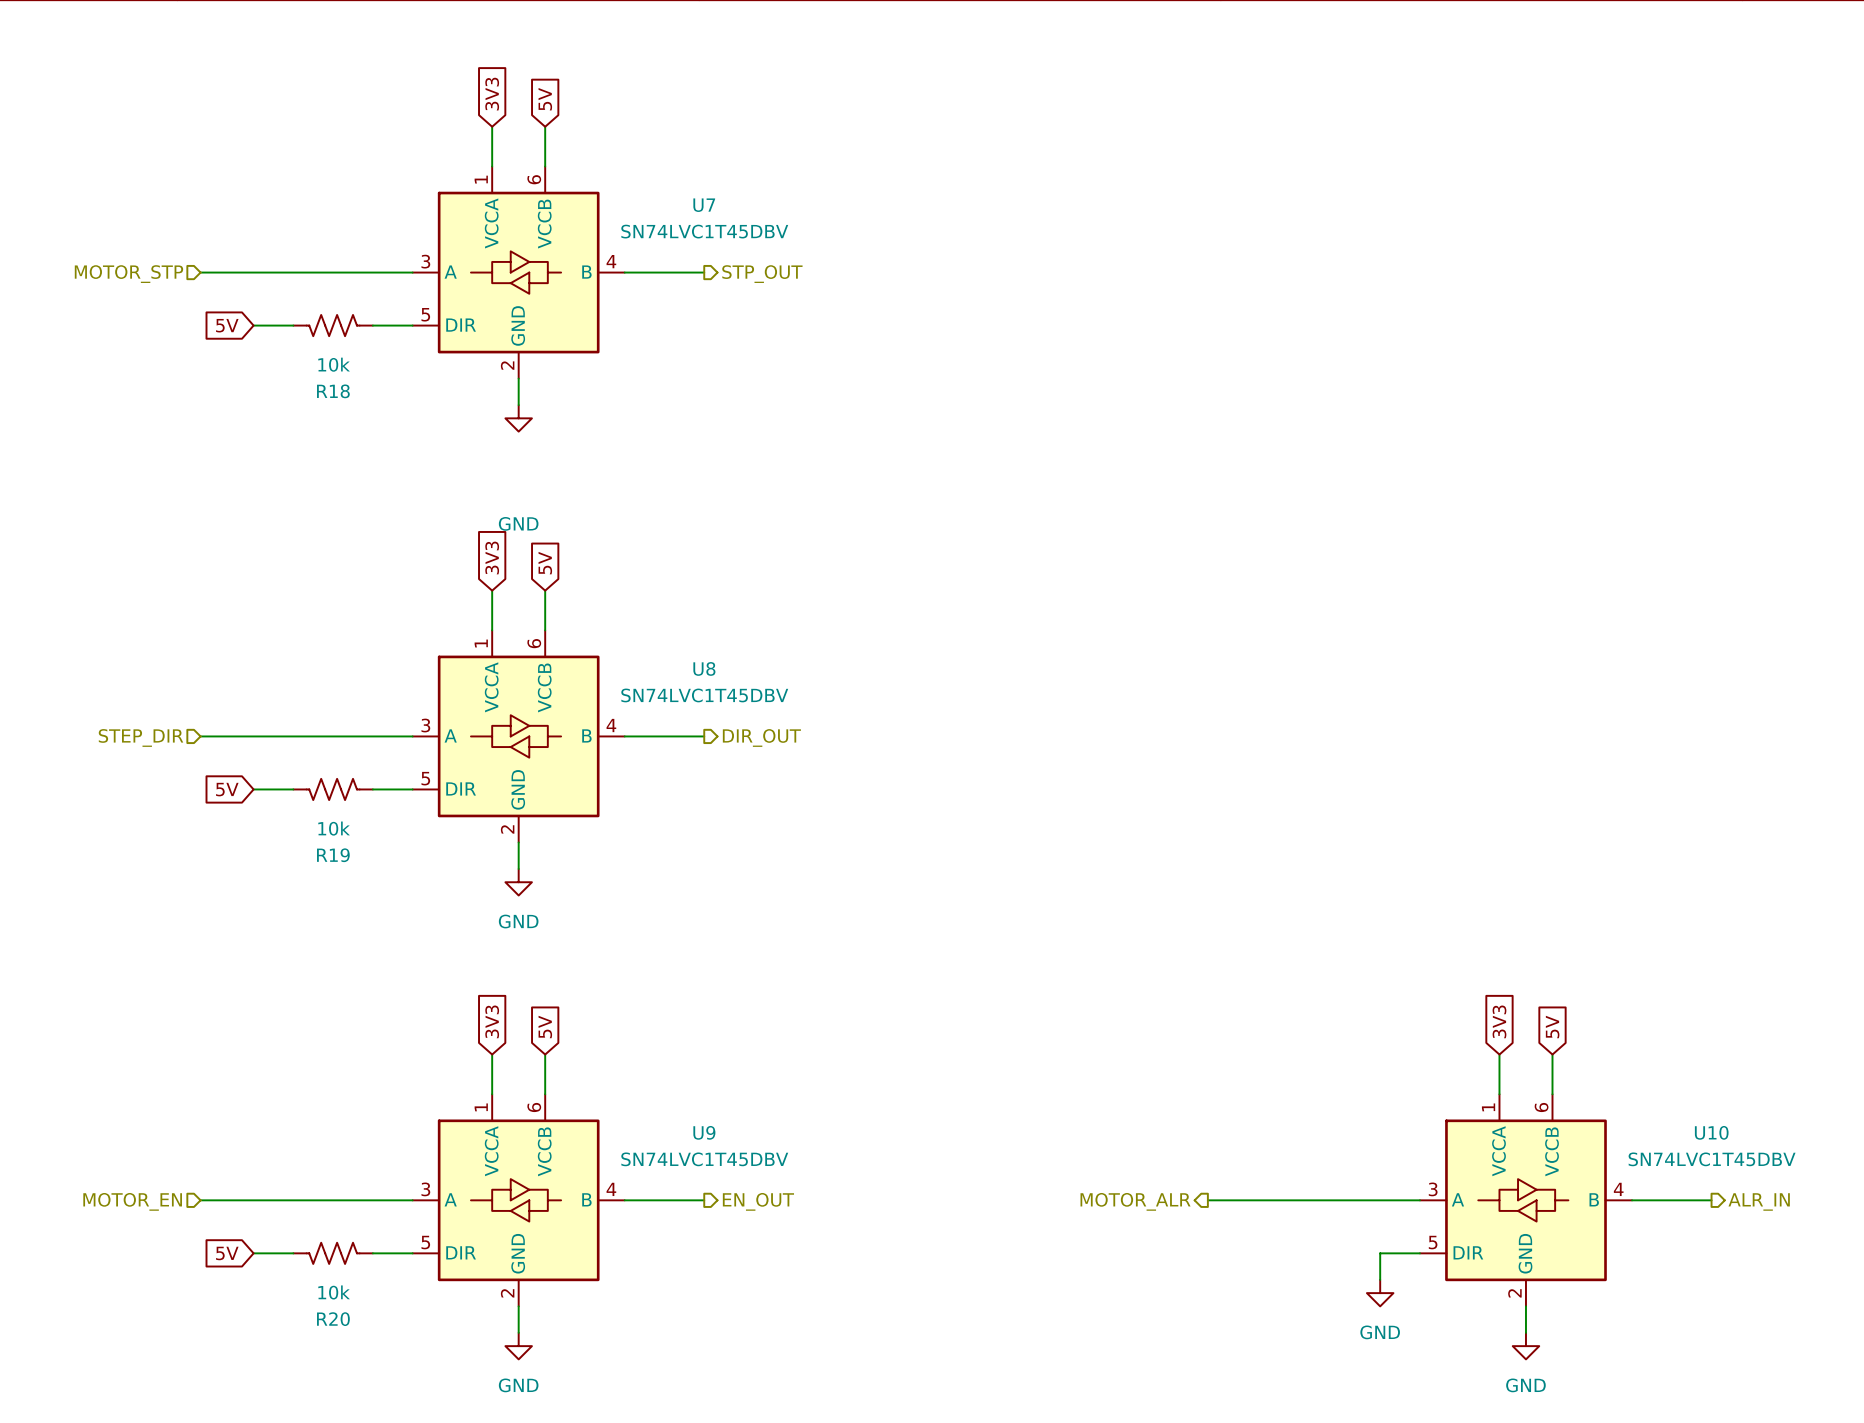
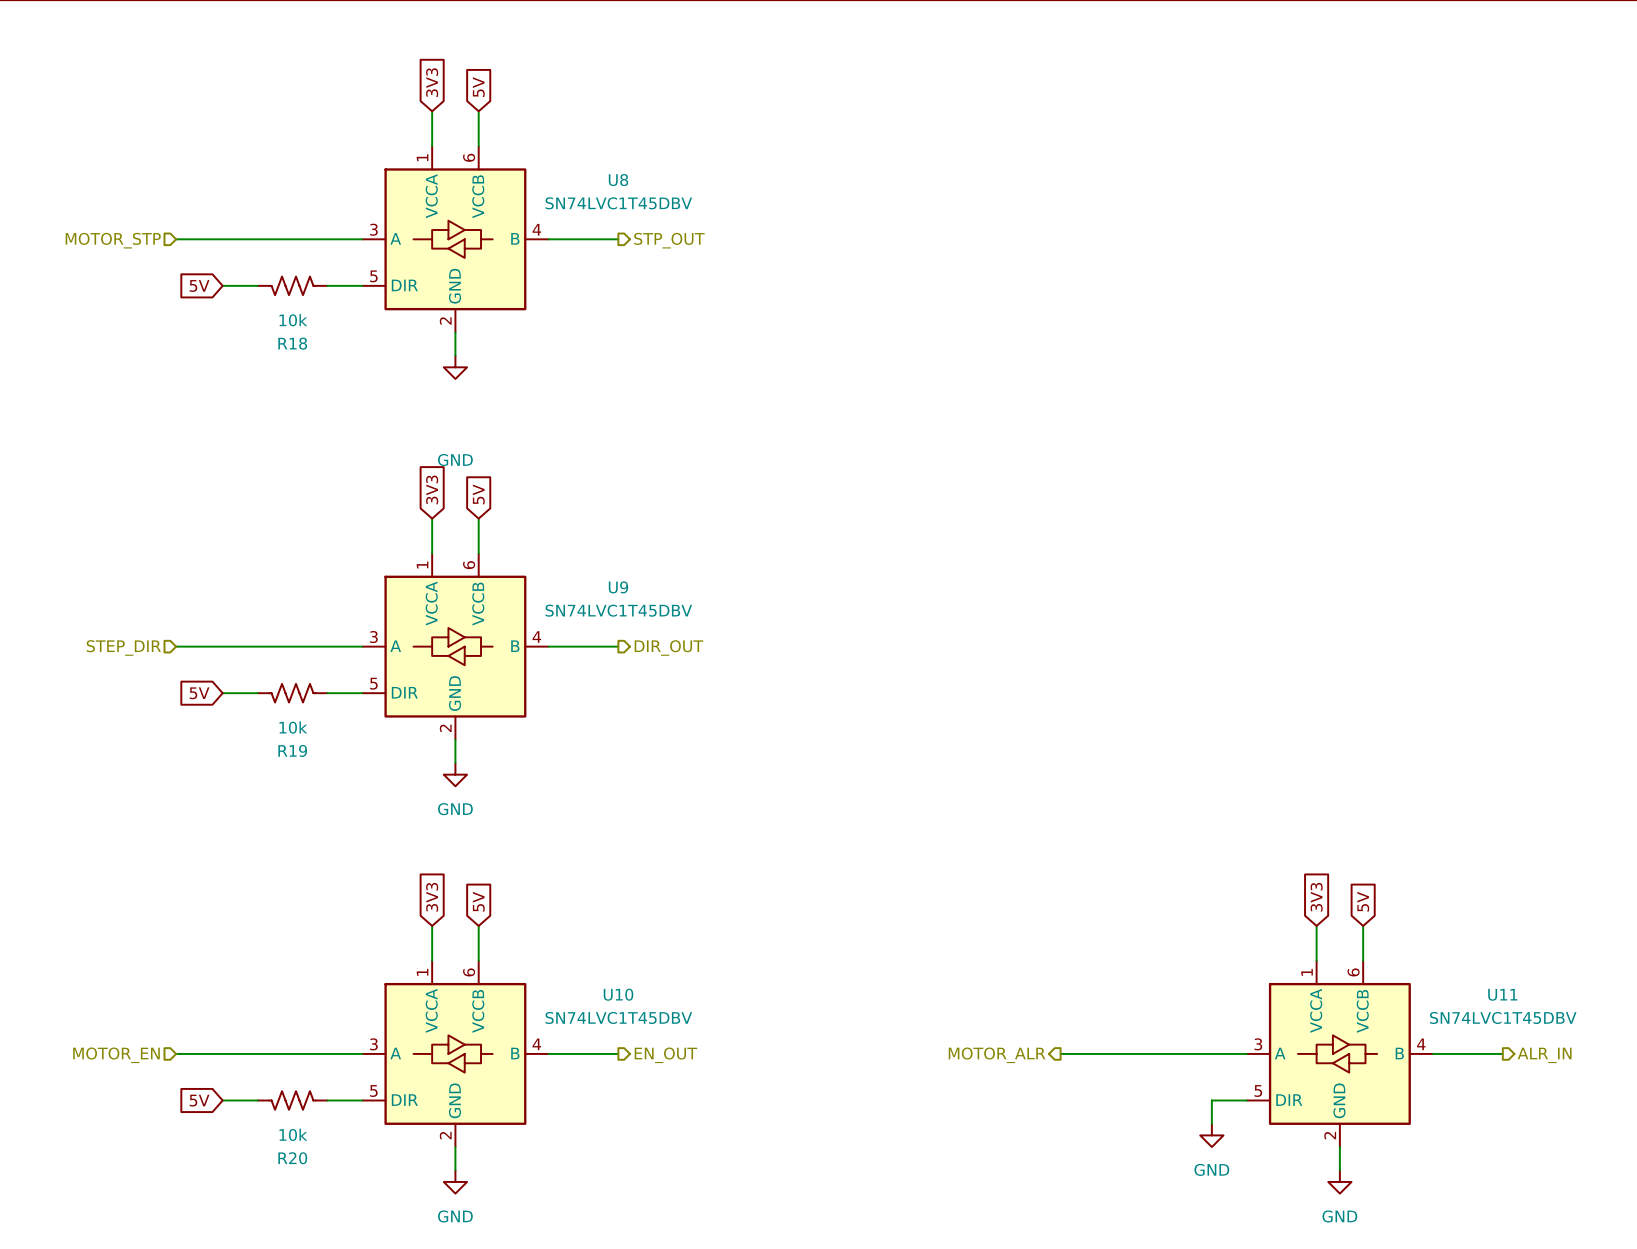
U7 name: U7 (704, 205) -> U8 (618, 180)
U8 name: U8 (704, 668) -> U9 (618, 587)
U9 name: U9 (704, 1132) -> U10 (618, 994)
U10 name: U10 (1711, 1132) -> U11 (1502, 994)

